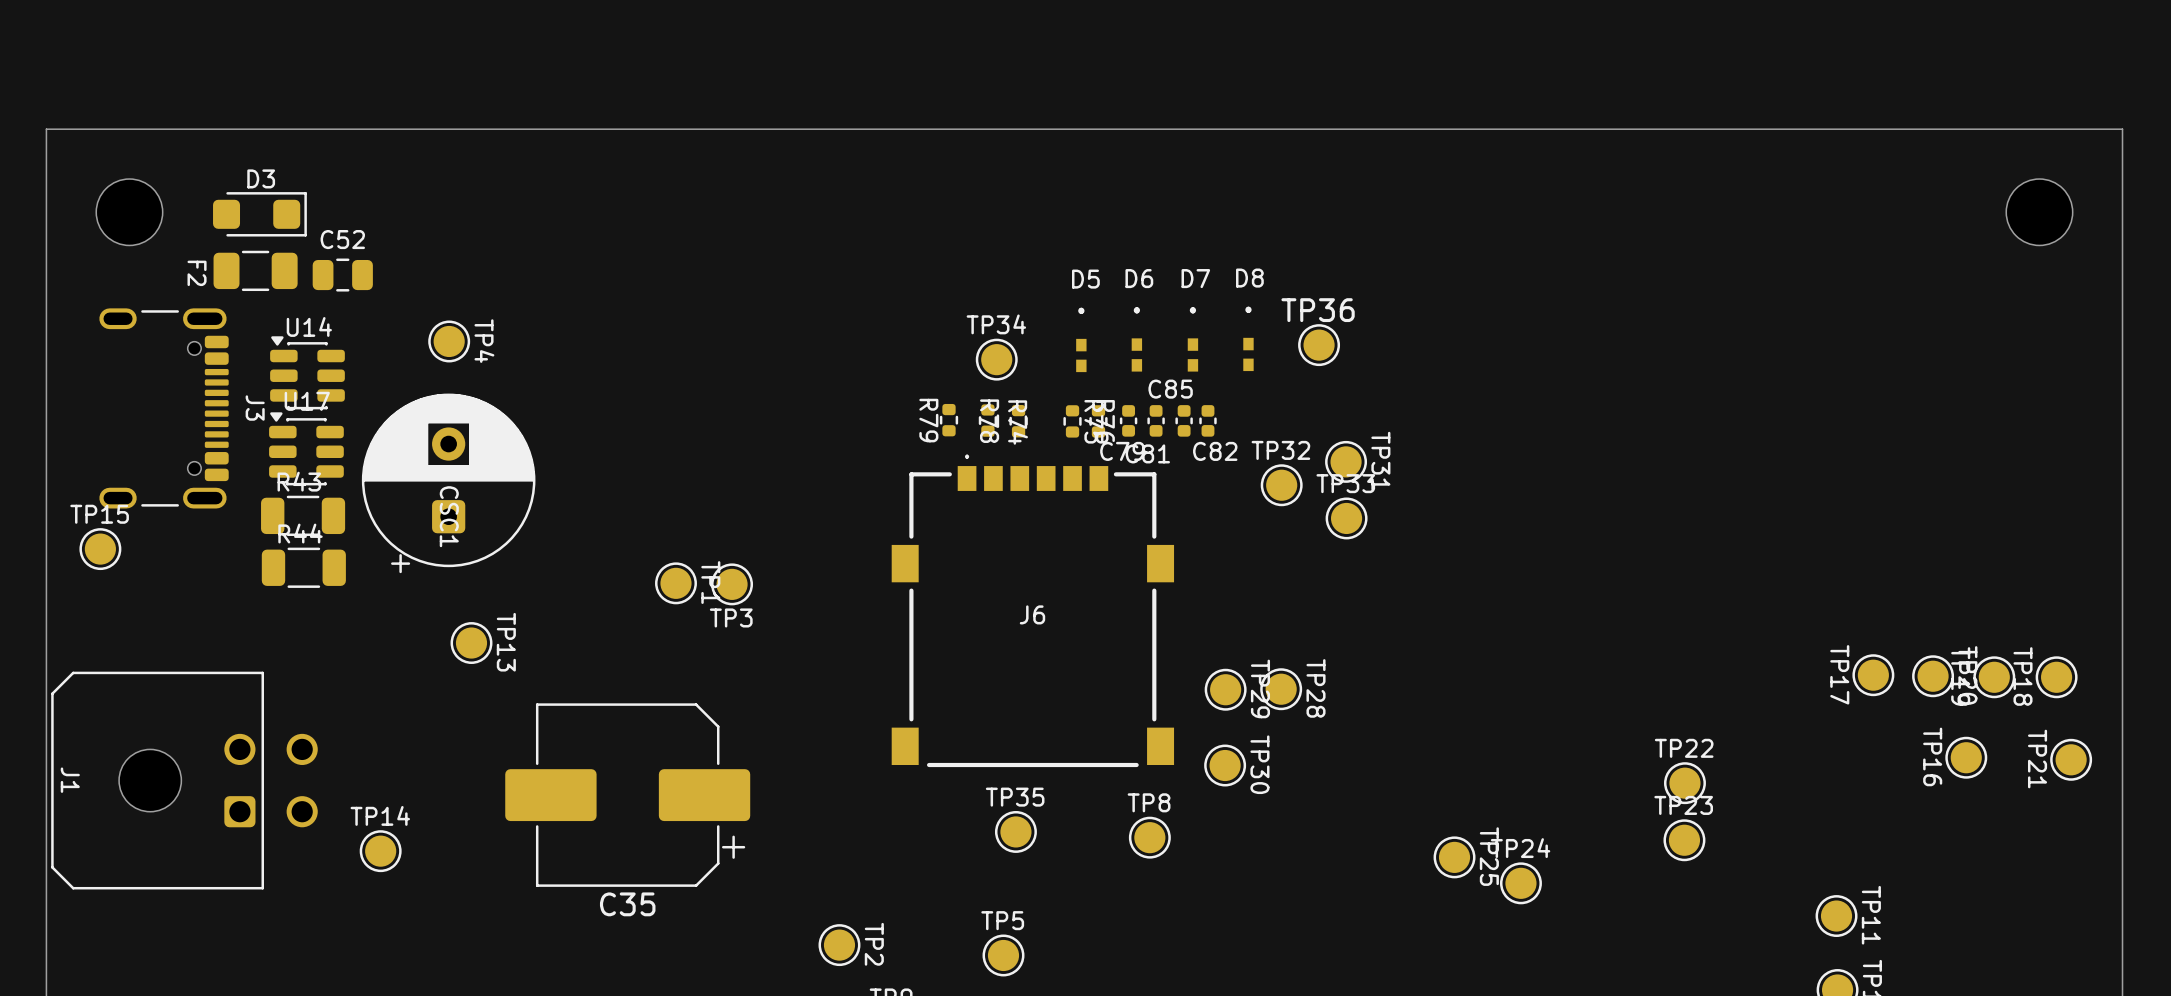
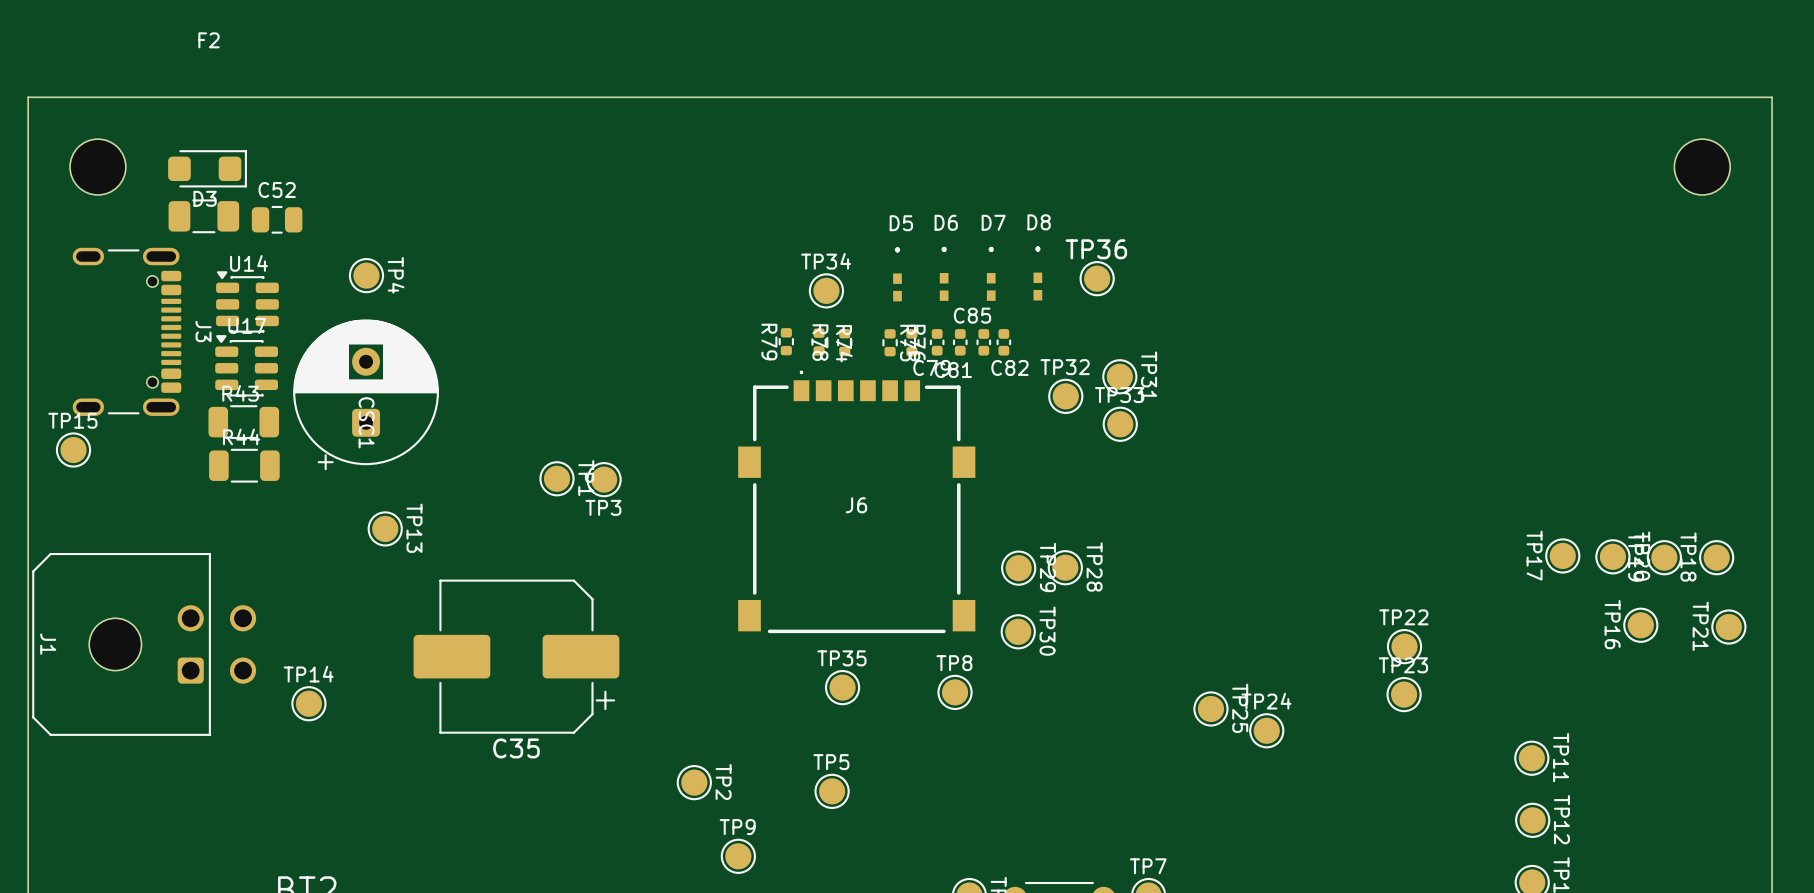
D3 name position: D3 (261, 178) -> D3 (205, 198)
F2 name rotation: 0° (197, 273) -> 90° counterclockwise (209, 40)
F2 name position: F2 (197, 273) -> F2 (209, 40)

